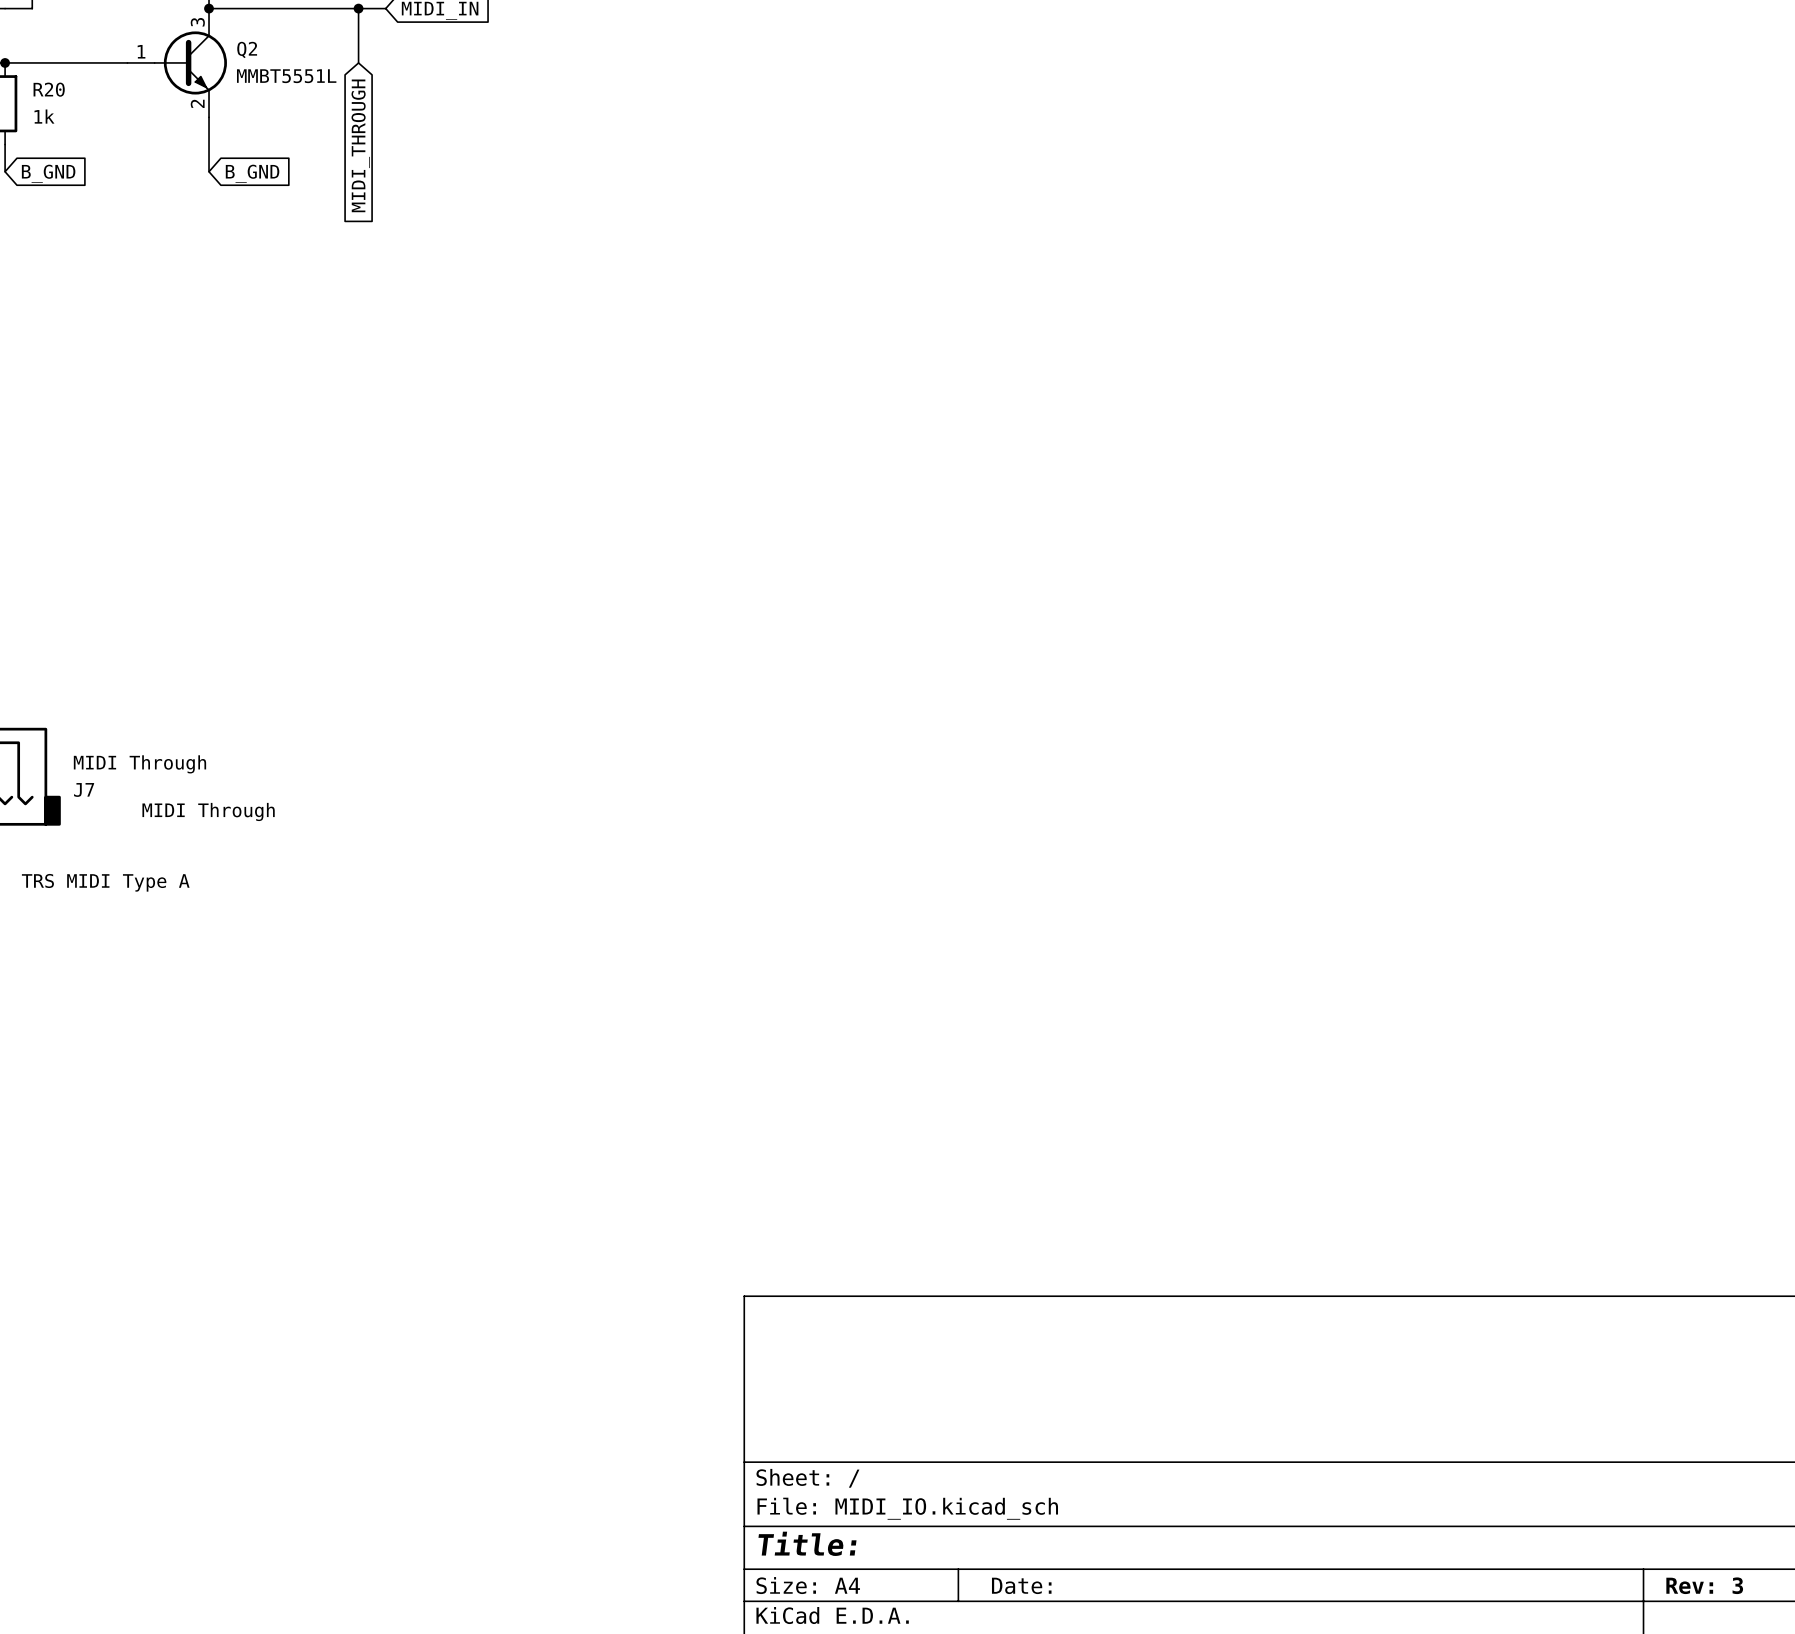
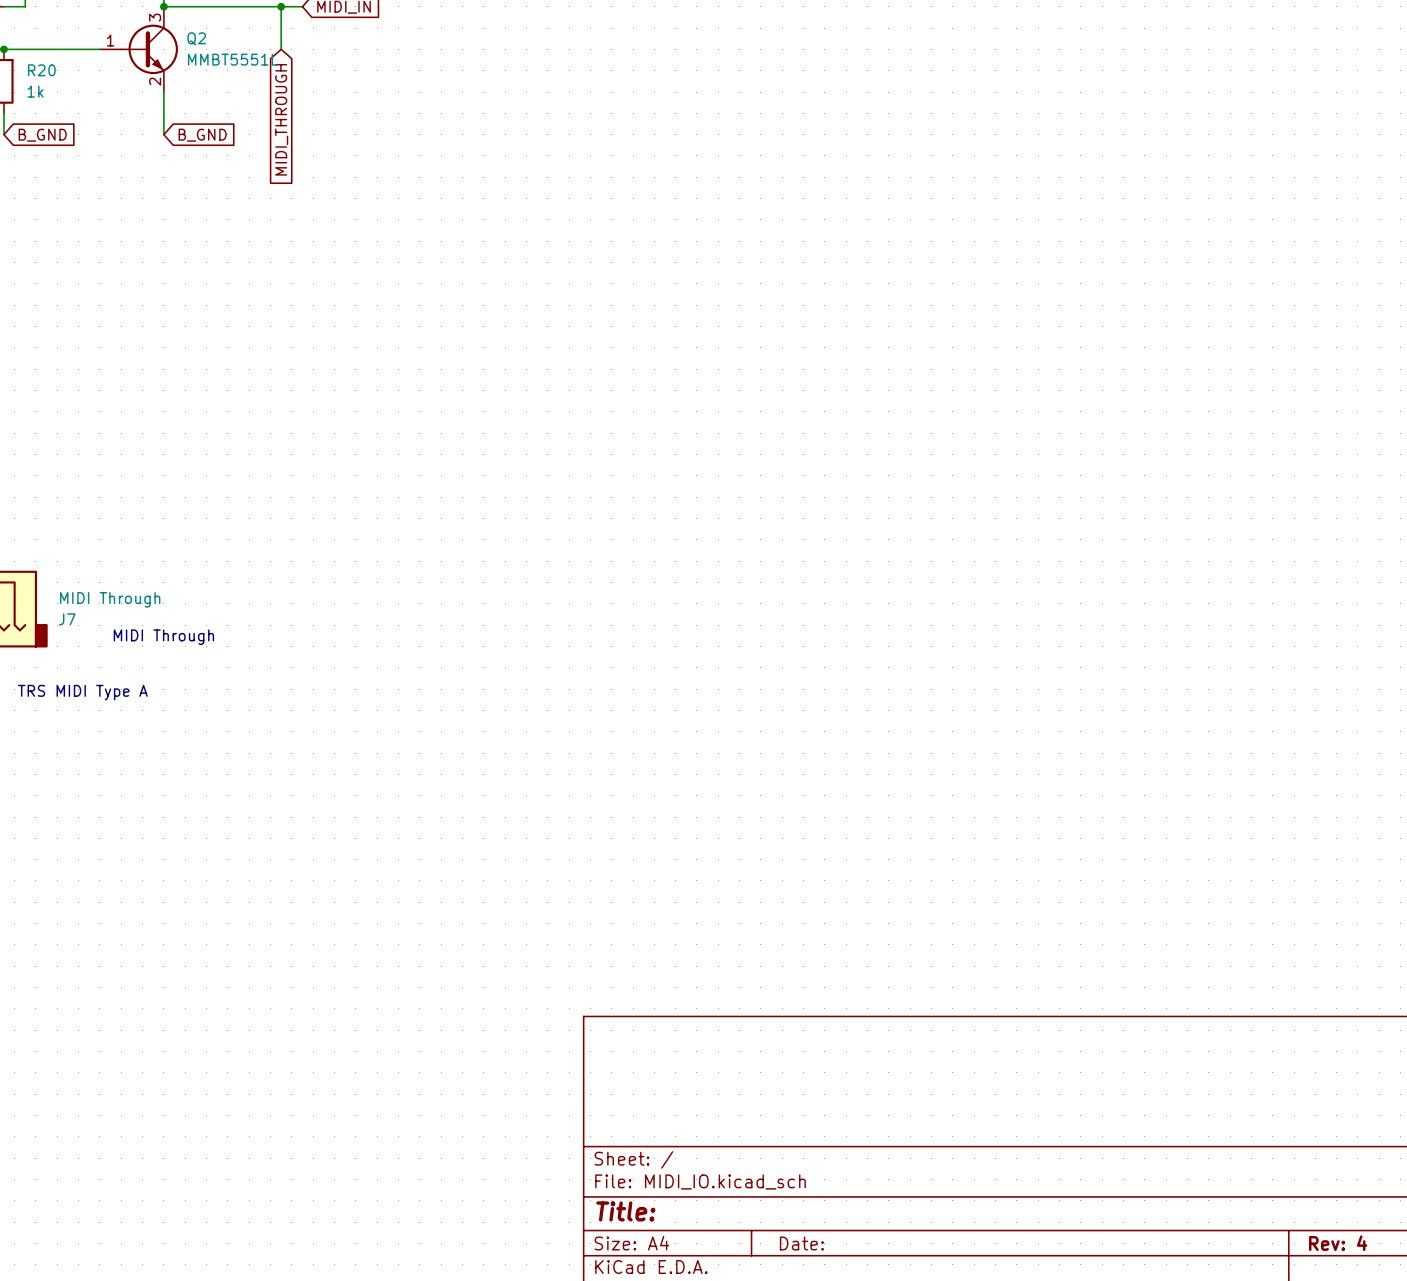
title block: Rev: 3 (1704, 1585) -> Rev: 4 (1338, 1243)

